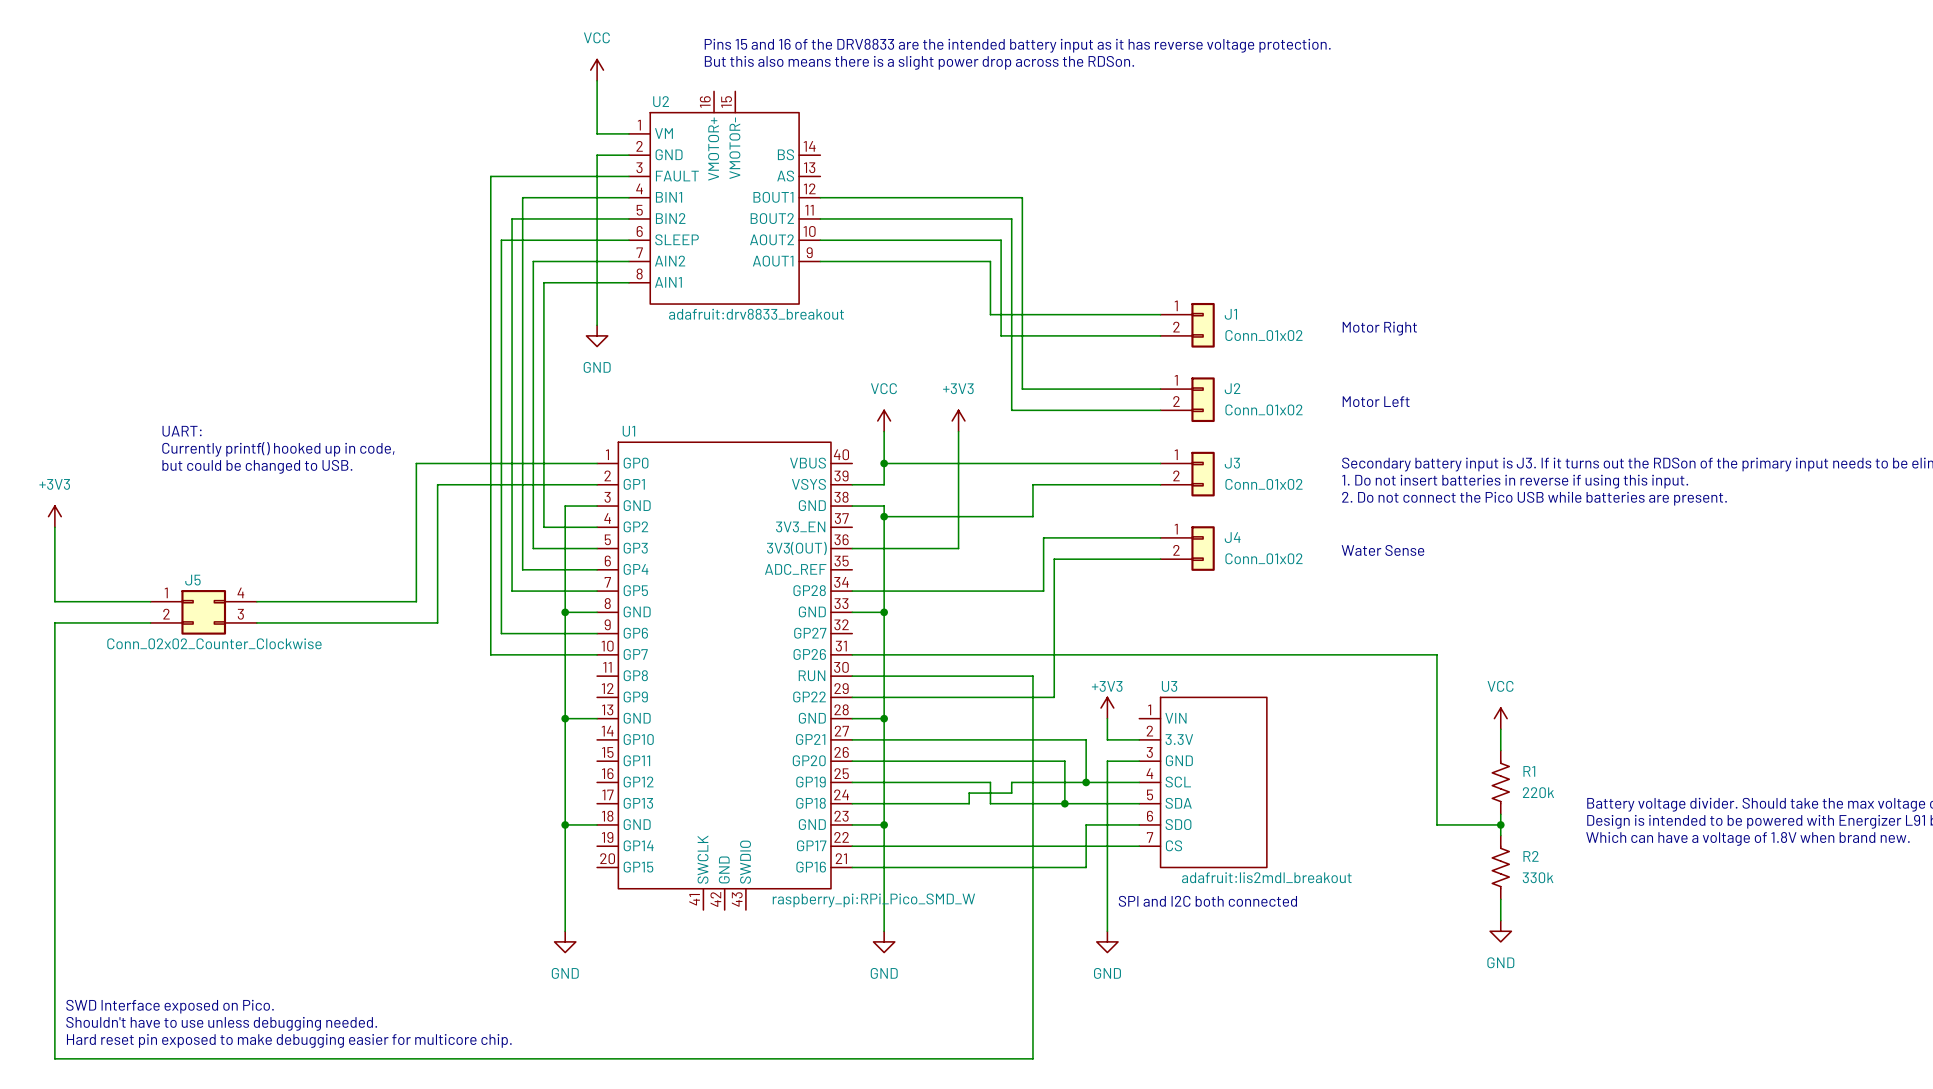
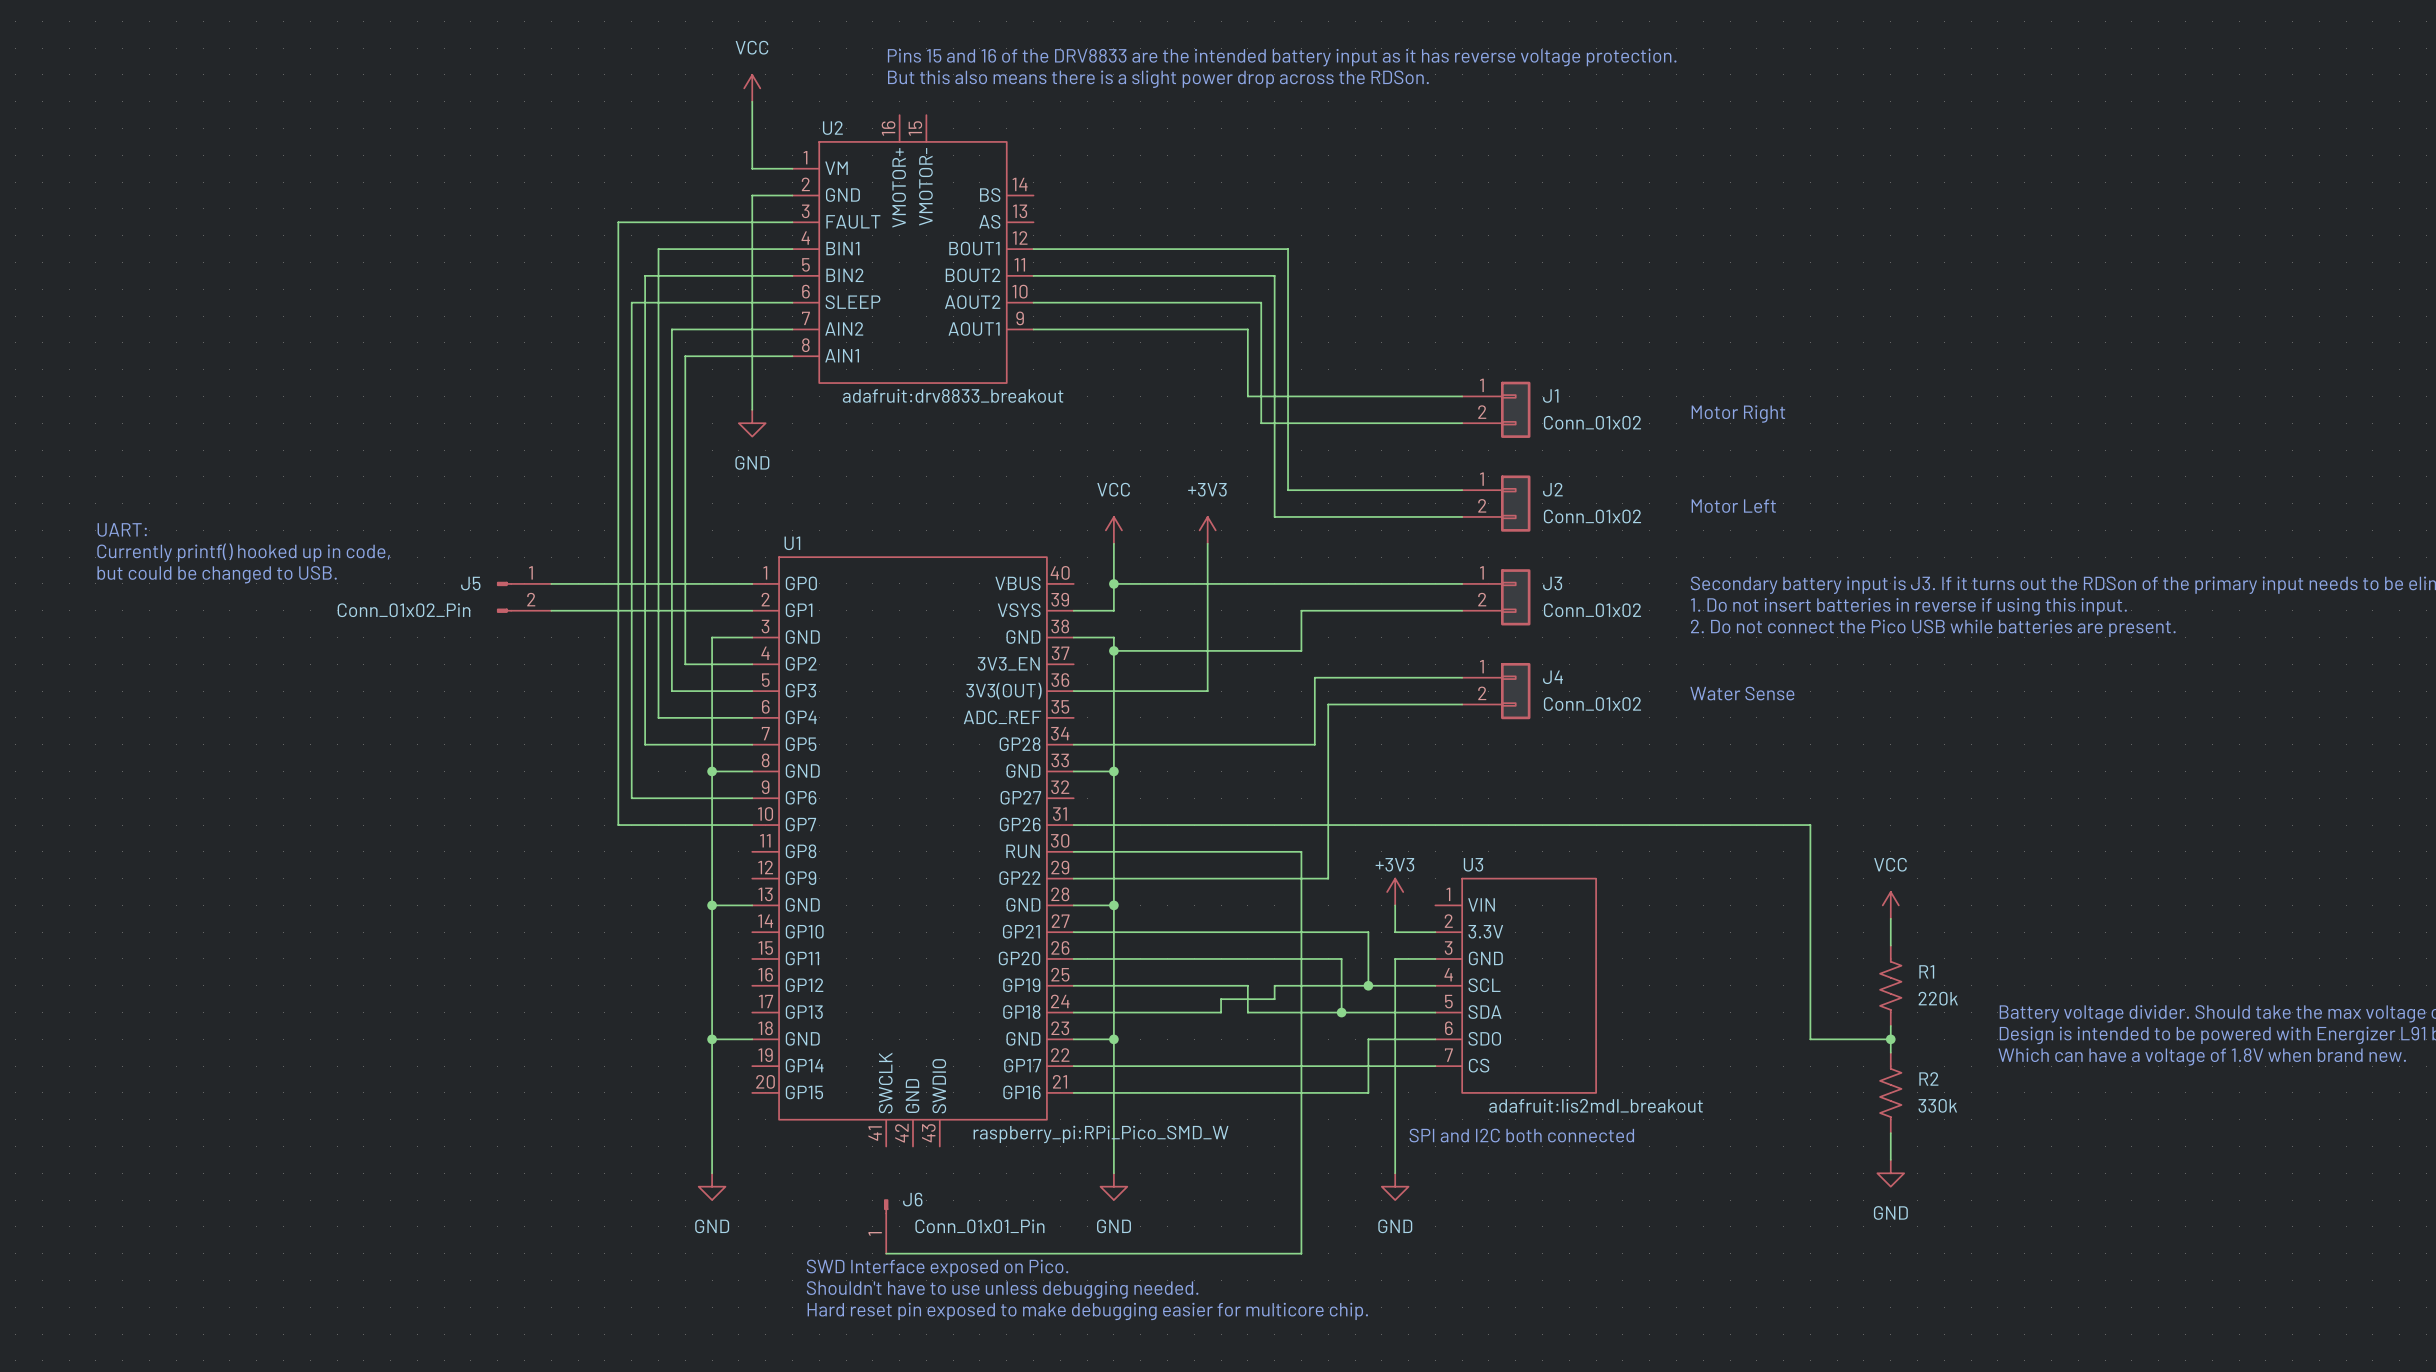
text position: UART: (182, 431) -> UART: (122, 529)
text position: Currently printf() hooked up in code, (278, 449) -> Currently printf() hooked up in code, (243, 552)
wire: (437, 463) (416, 463) (416, 601) (256, 601) -> none
text position: but could be changed to USB. (257, 466) -> but could be changed to USB. (217, 574)
wire: (437, 484) (437, 622) (256, 622) -> none
power symbol: +3V3 (54, 516) -> none
wire: (54, 527) (54, 601) (150, 601) -> none
J5 name position: J5 (192, 580) -> J5 (470, 583)
J5 symbol: [150, 590, 257, 635] -> [496, 581, 552, 613]
wire: (150, 622) (54, 622) (54, 1058) (1032, 1058) (1032, 995) -> (886, 1253) (1301, 1253)
J5 value: Conn_02x02_Counter_Clockwise (214, 643) -> Conn_01x02_Pin (403, 610)
J6: none -> Conn_01x01_Pin (886, 1226)
text: SWD Interface exposed on Pico. (170, 1006) -> none
text: none -> SWD Interface exposed on Pico. (937, 1268)
text: Shouldn't have to use unless debugging needed. (221, 1023) -> none
text: none -> Shouldn't have to use unless debugging needed. (1002, 1289)
text: Hard reset pin exposed to make debugging easier for multicore chip. (289, 1040) -> none
text: none -> Hard reset pin exposed to make debugging easier for multicore chip. (1087, 1311)

